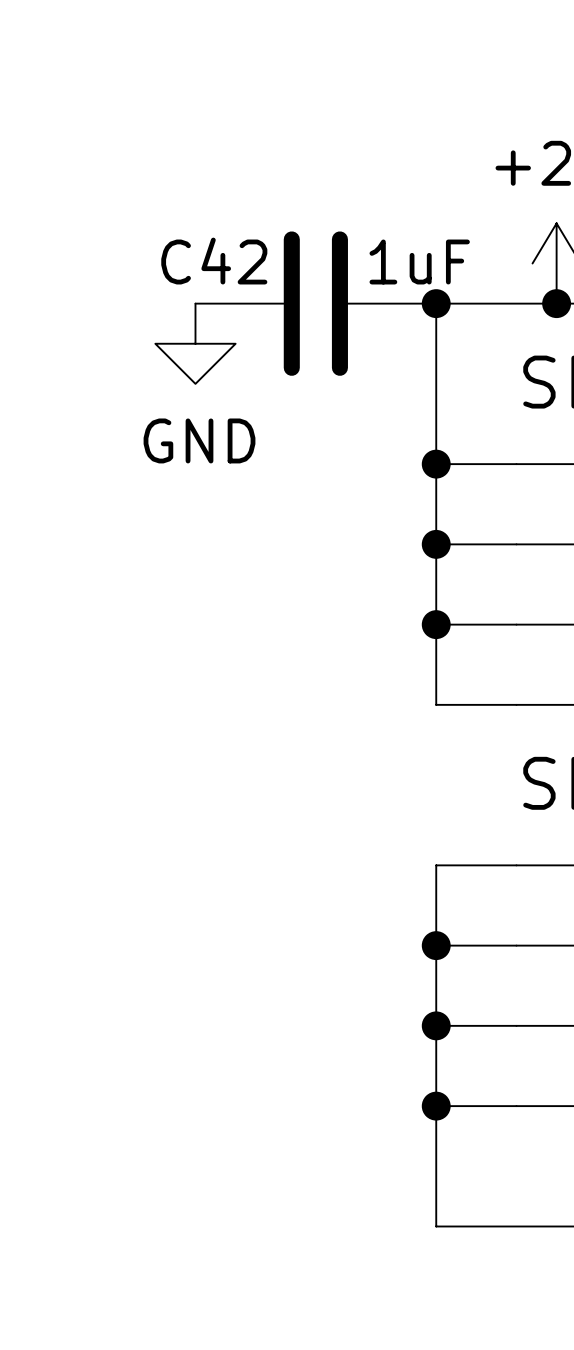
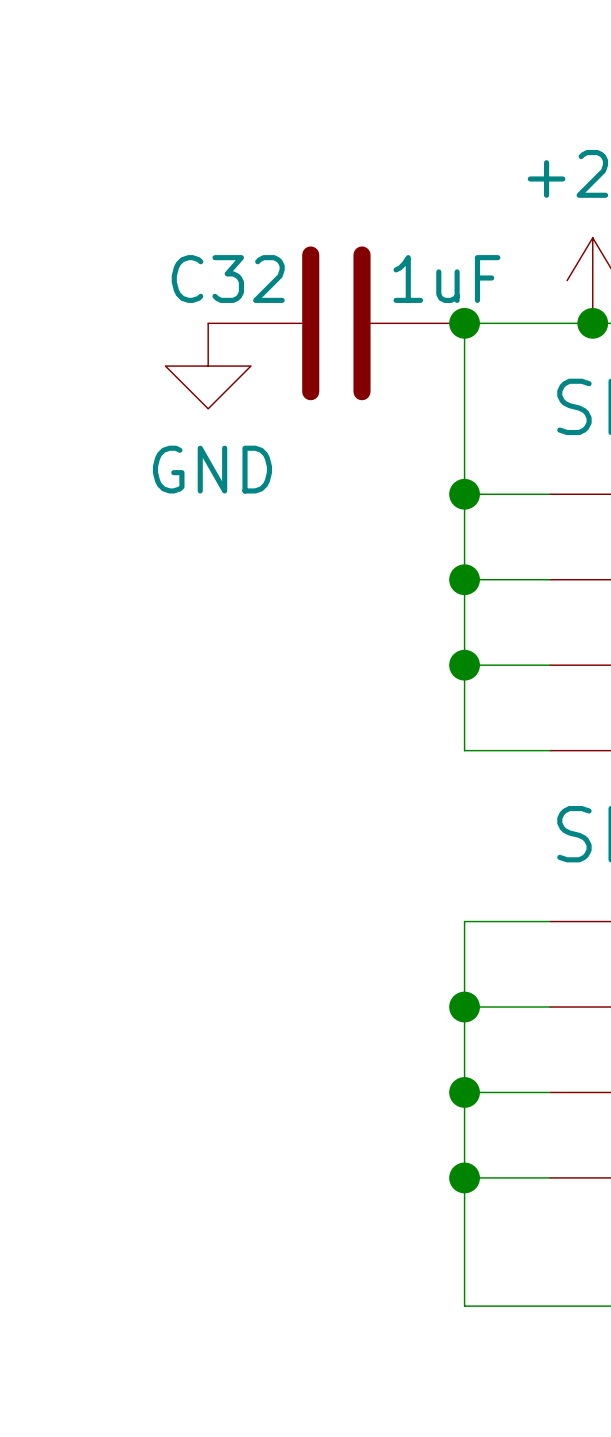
C42 name: C42 (214, 261) -> C32 (228, 279)

